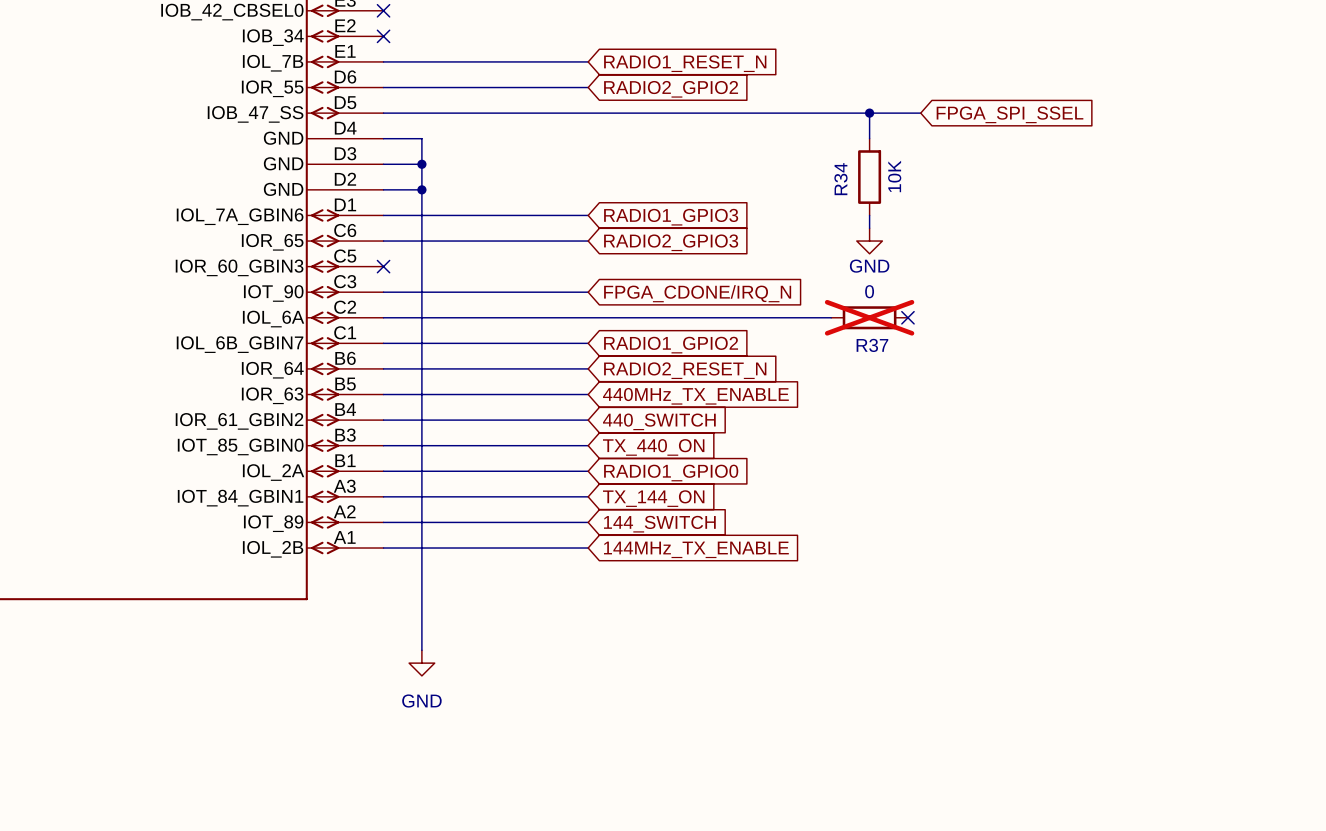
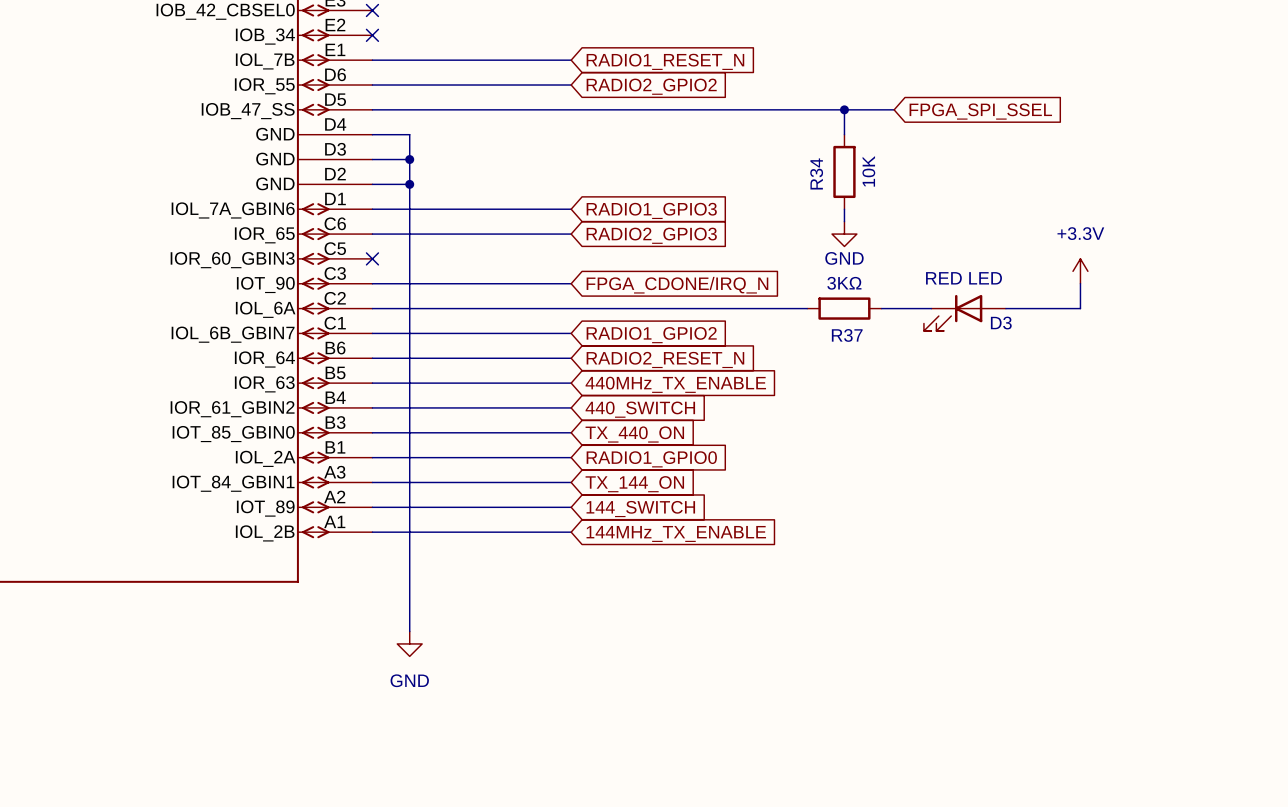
power symbol: none -> +3.3V (1080, 271)
R37 value: 0 (869, 291) -> 3KΩ (844, 283)
wire: none -> (1080, 283) (1080, 308) (1005, 308)
R37 do-not-place cross: (869, 317) -> none
wire: none -> (881, 308) (931, 308)
no-connect mark: (907, 317) -> none
D3: none -> RED LED (964, 312)

